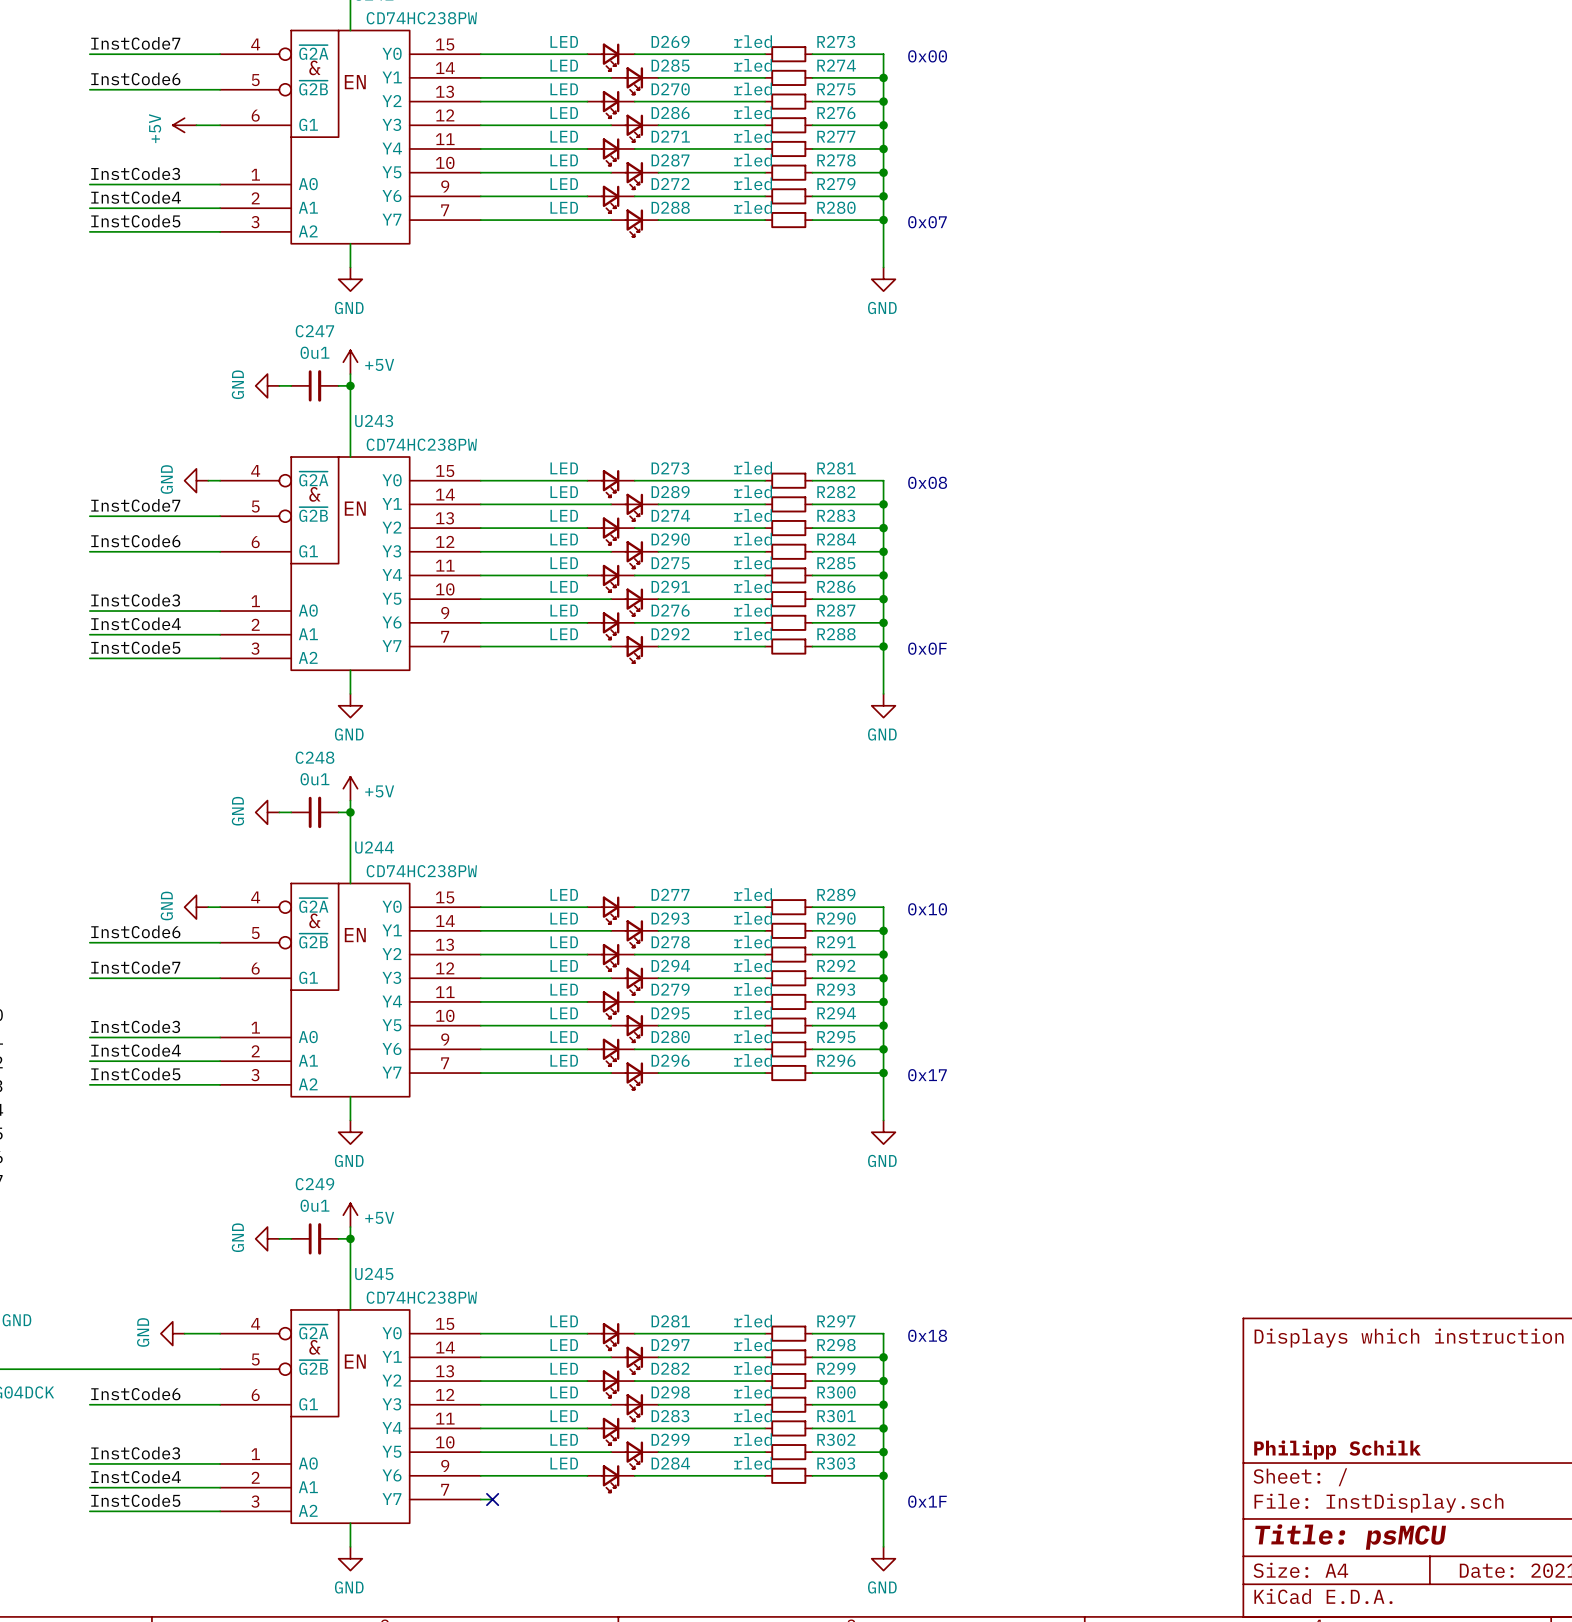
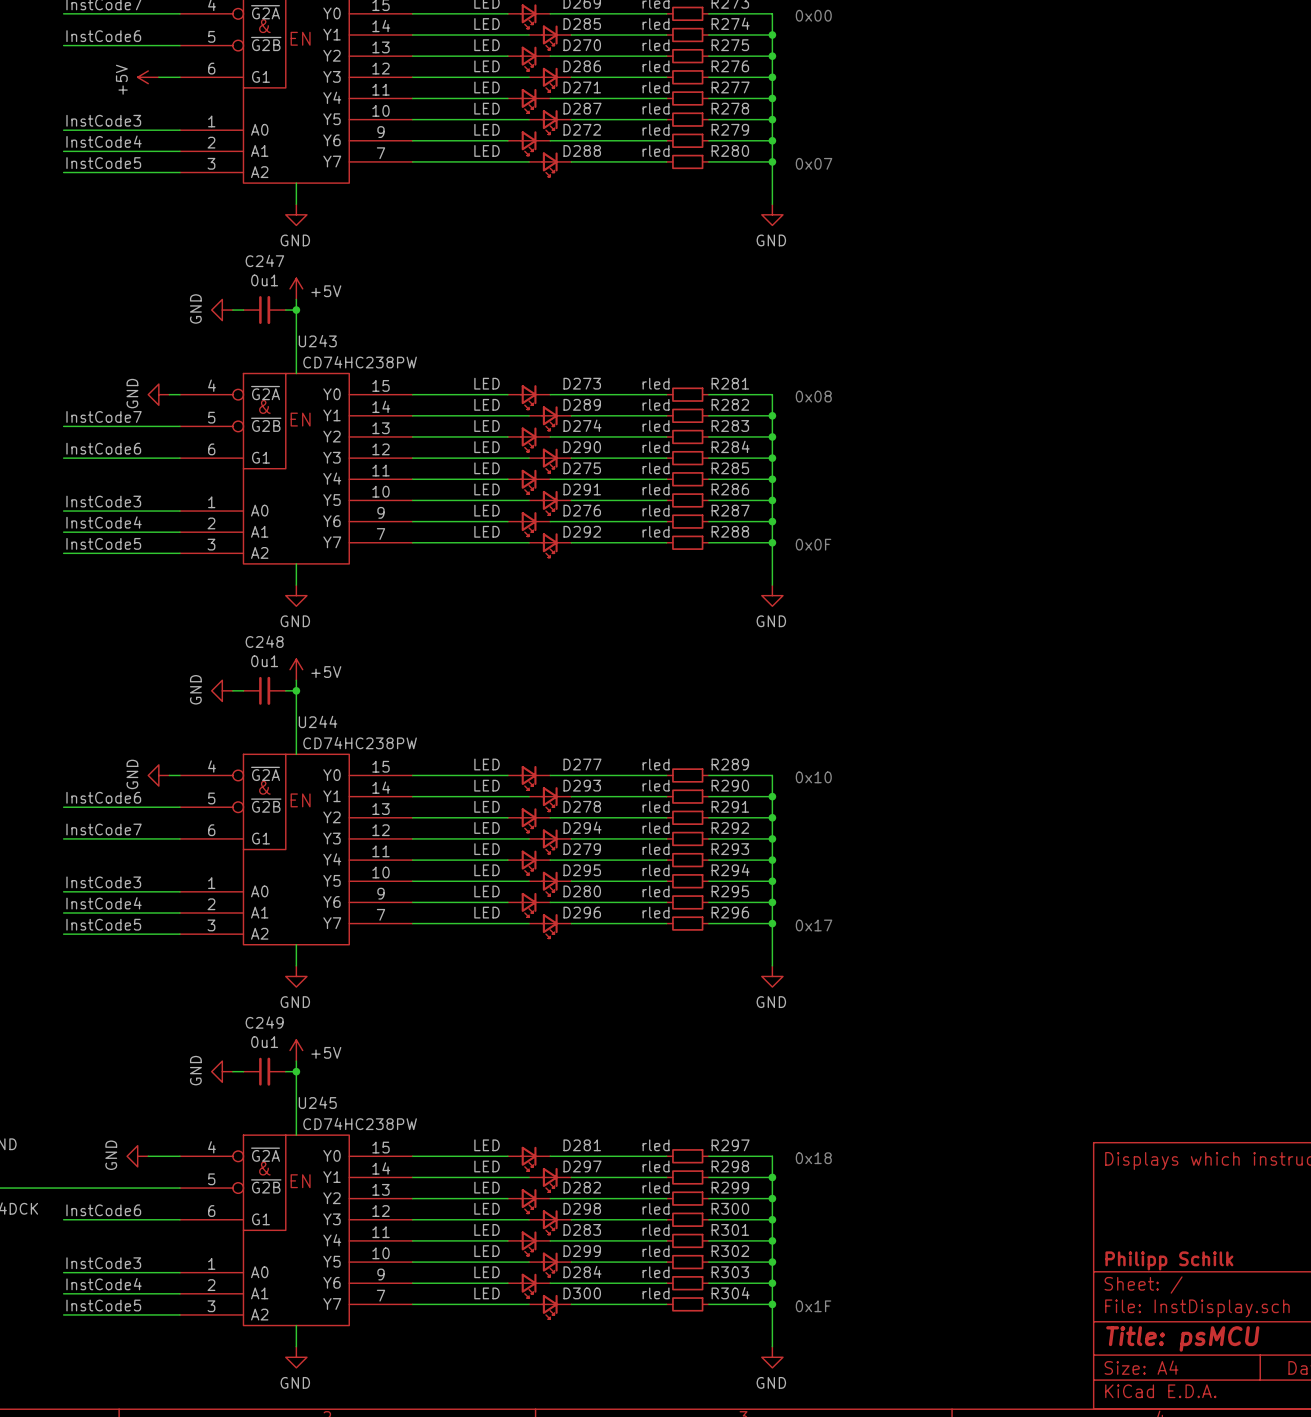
wire: none -> (423, 1304) (529, 1304)
no-connect mark: (492, 1499) -> none
wire: none -> (571, 1304) (666, 1304)
R304: none -> rled (687, 1304)
wire: none -> (708, 1304) (772, 1304)
junction: none -> (772, 1304)
D300: none -> LED (550, 1307)

